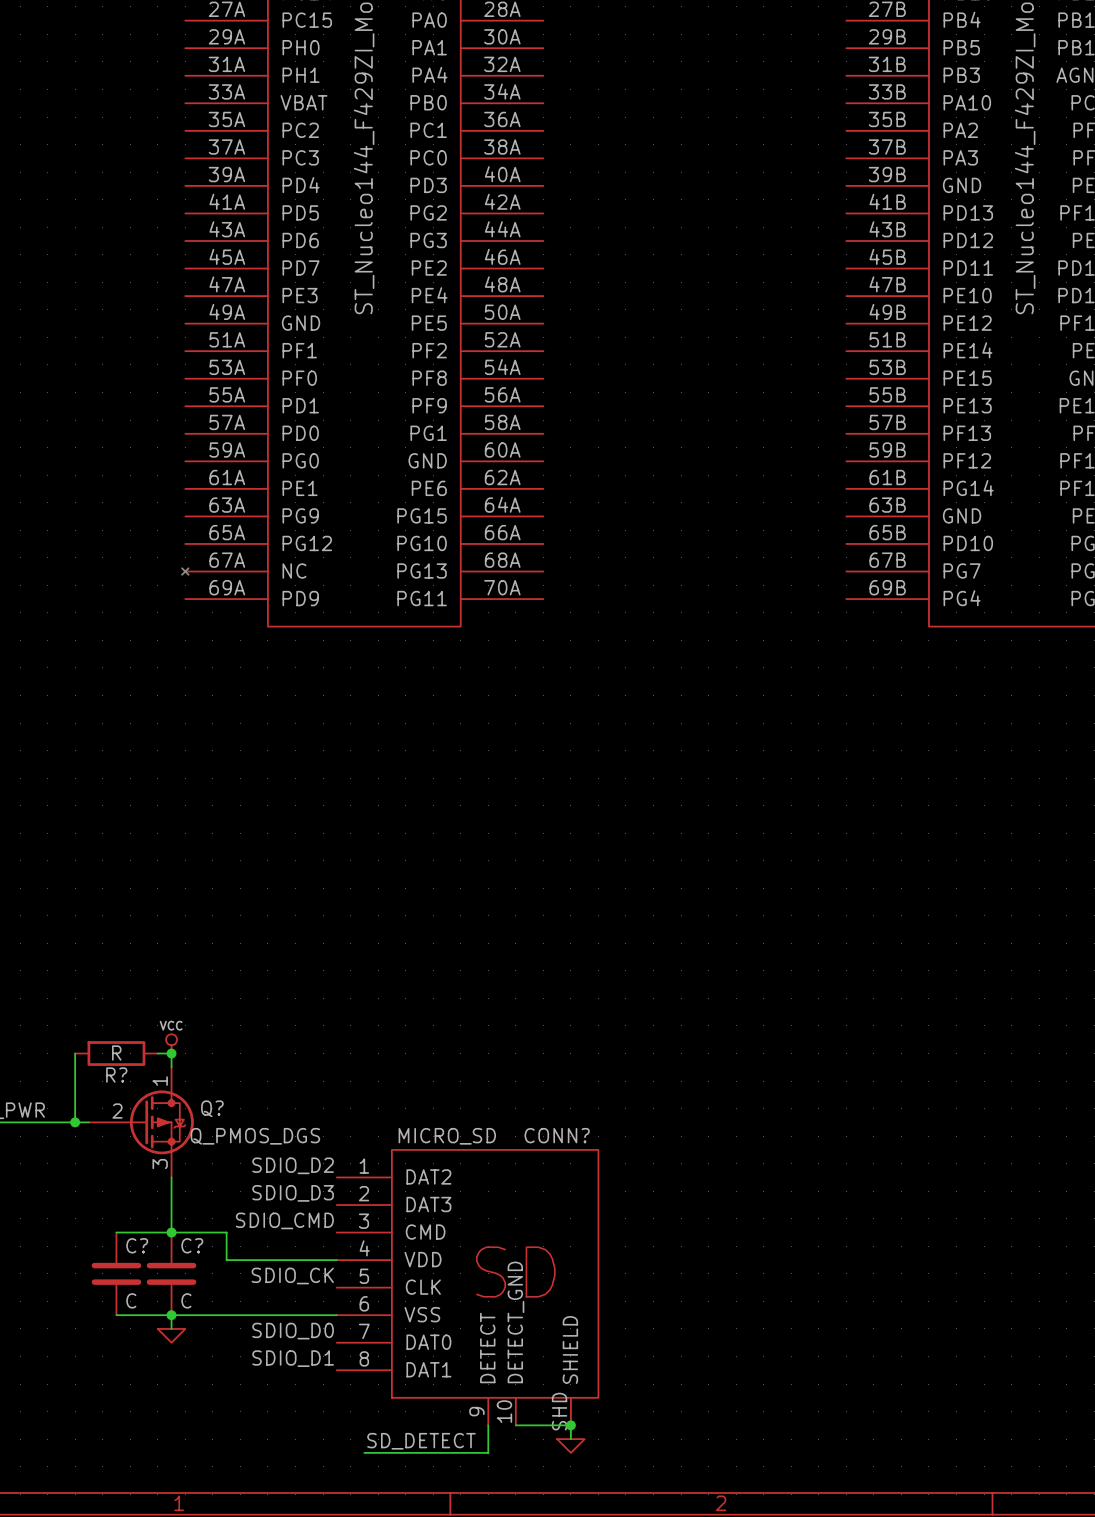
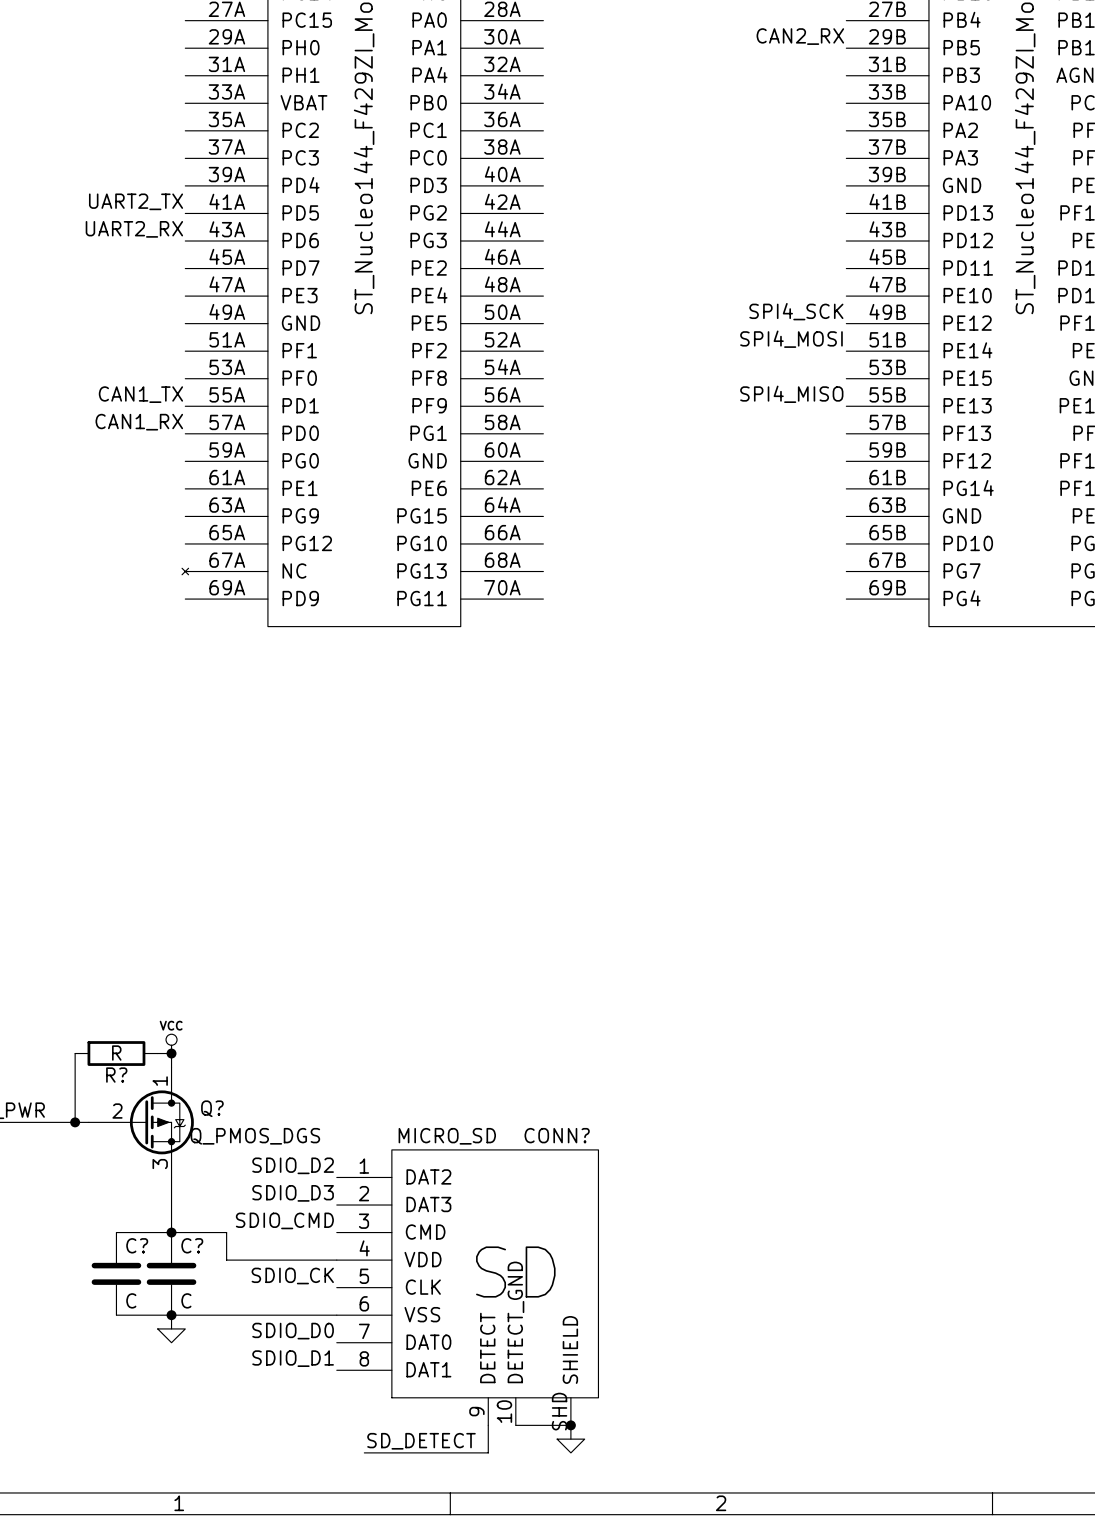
label: none -> CAN2_RX (800, 36)
label: none -> UART2_TX (136, 201)
label: none -> UART2_RX (134, 229)
label: none -> SPI4_SCK (796, 311)
label: none -> SPI4_MOSI (791, 339)
label: none -> CAN1_TX (140, 394)
label: none -> SPI4_MISO (791, 394)
label: none -> CAN1_RX (139, 422)

